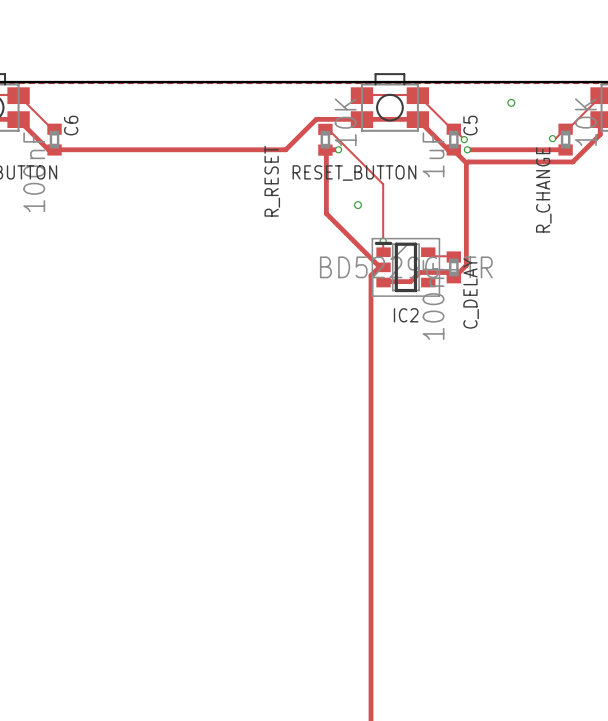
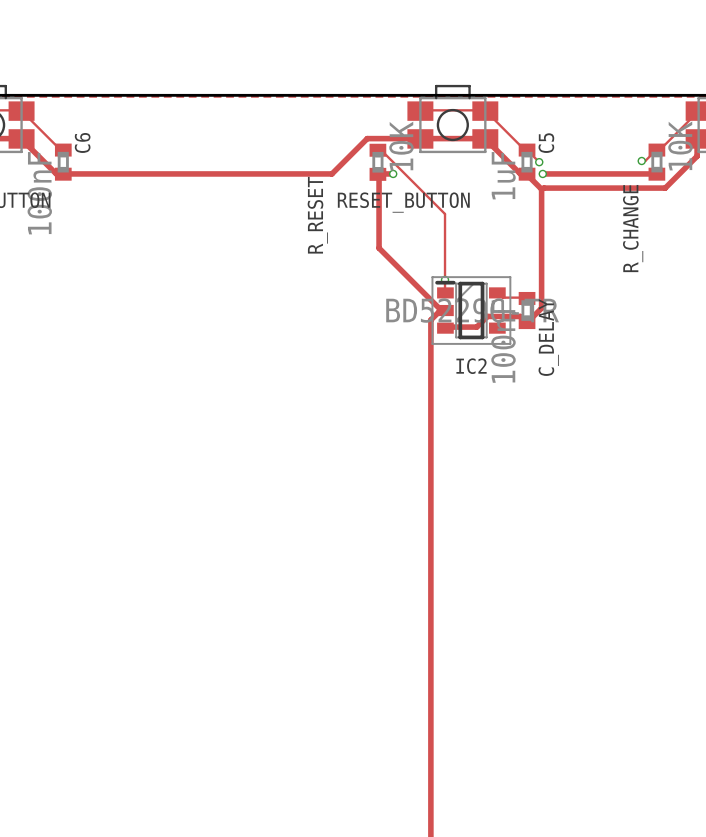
via: (511, 102) -> none
via: (357, 205) -> none

